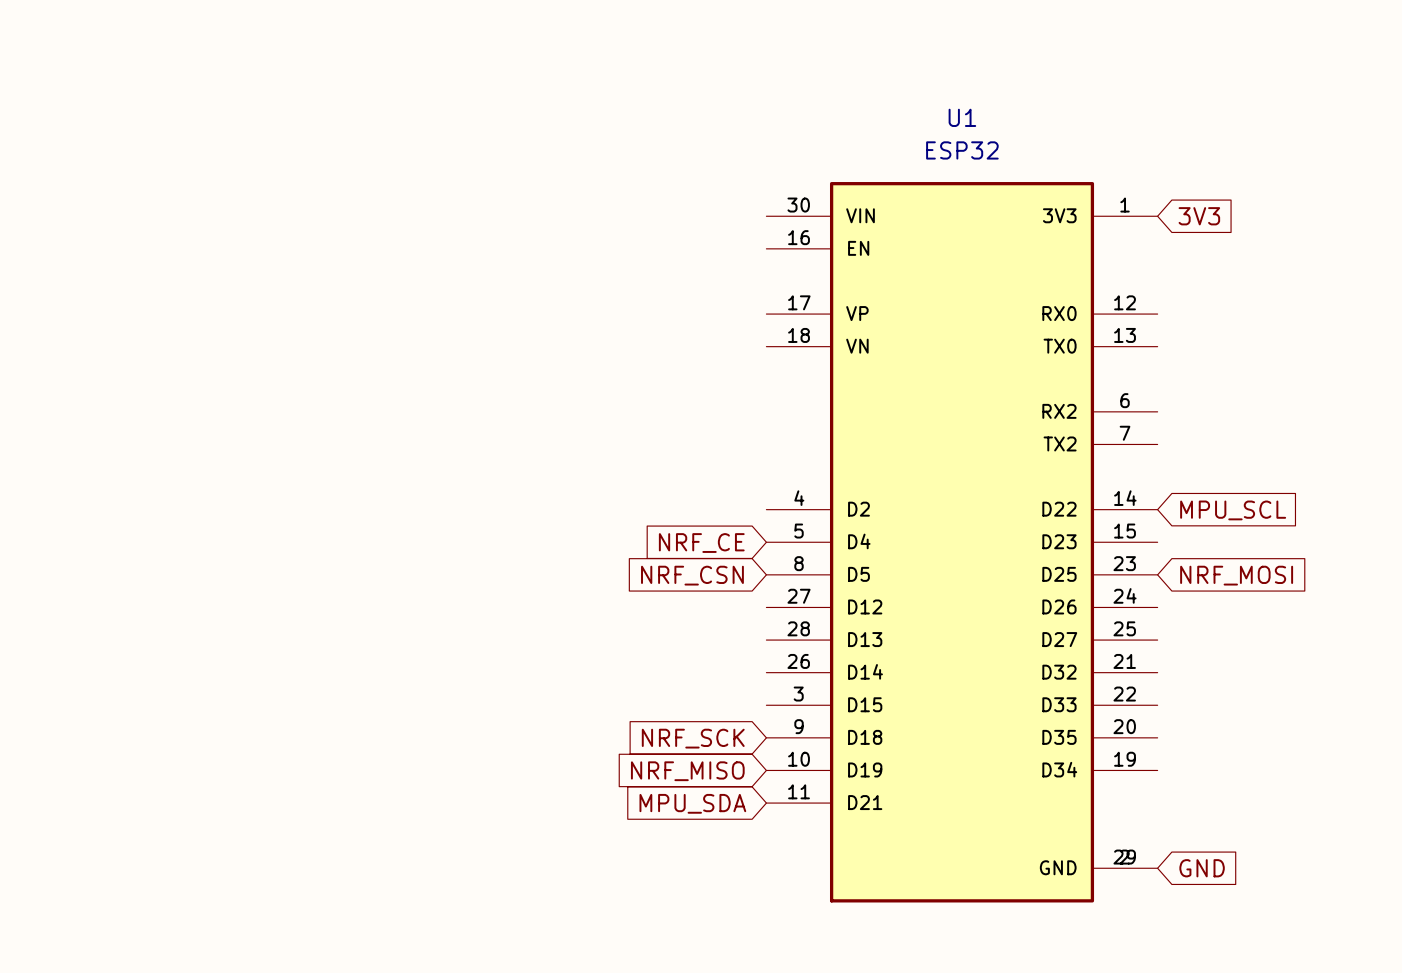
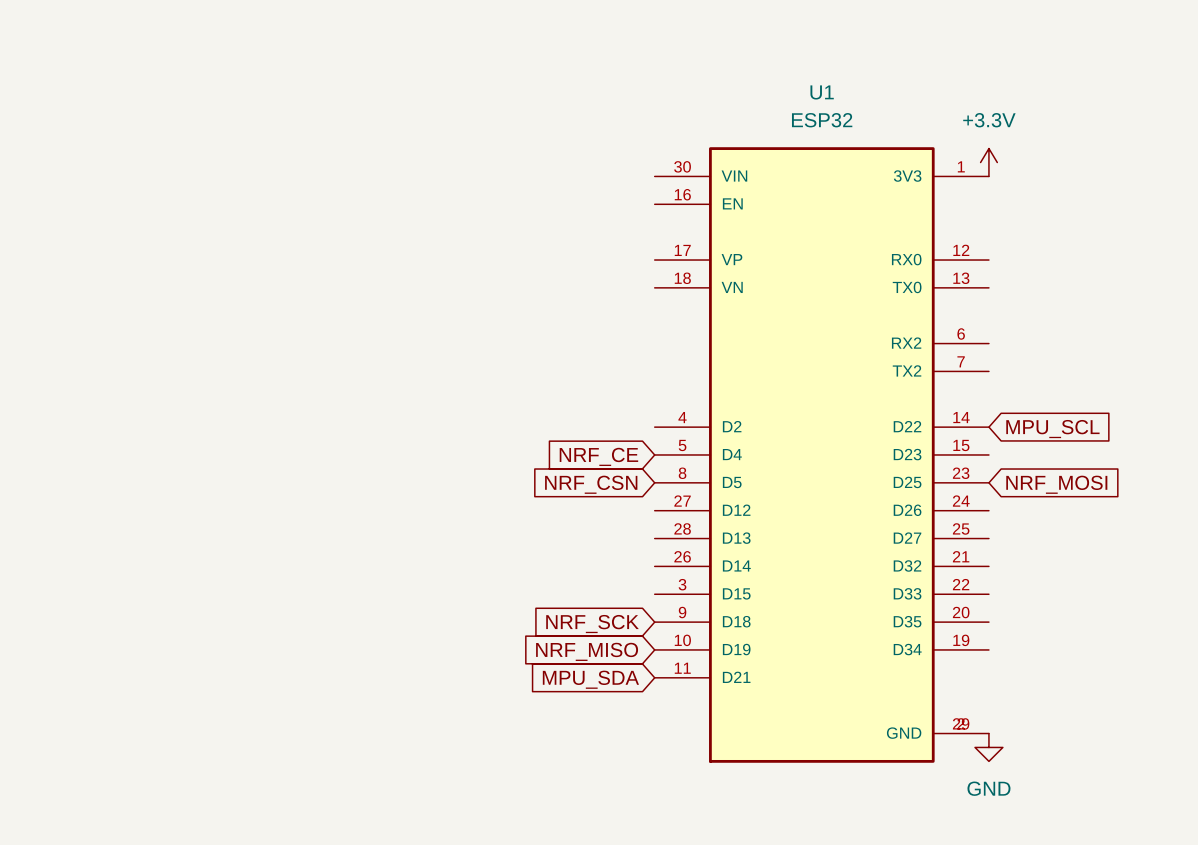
power symbol: none -> +3.3V (988, 162)
global label: 3V3 (1199, 216) -> none
global label: GND (1202, 868) -> none
power symbol: none -> GND (988, 747)

